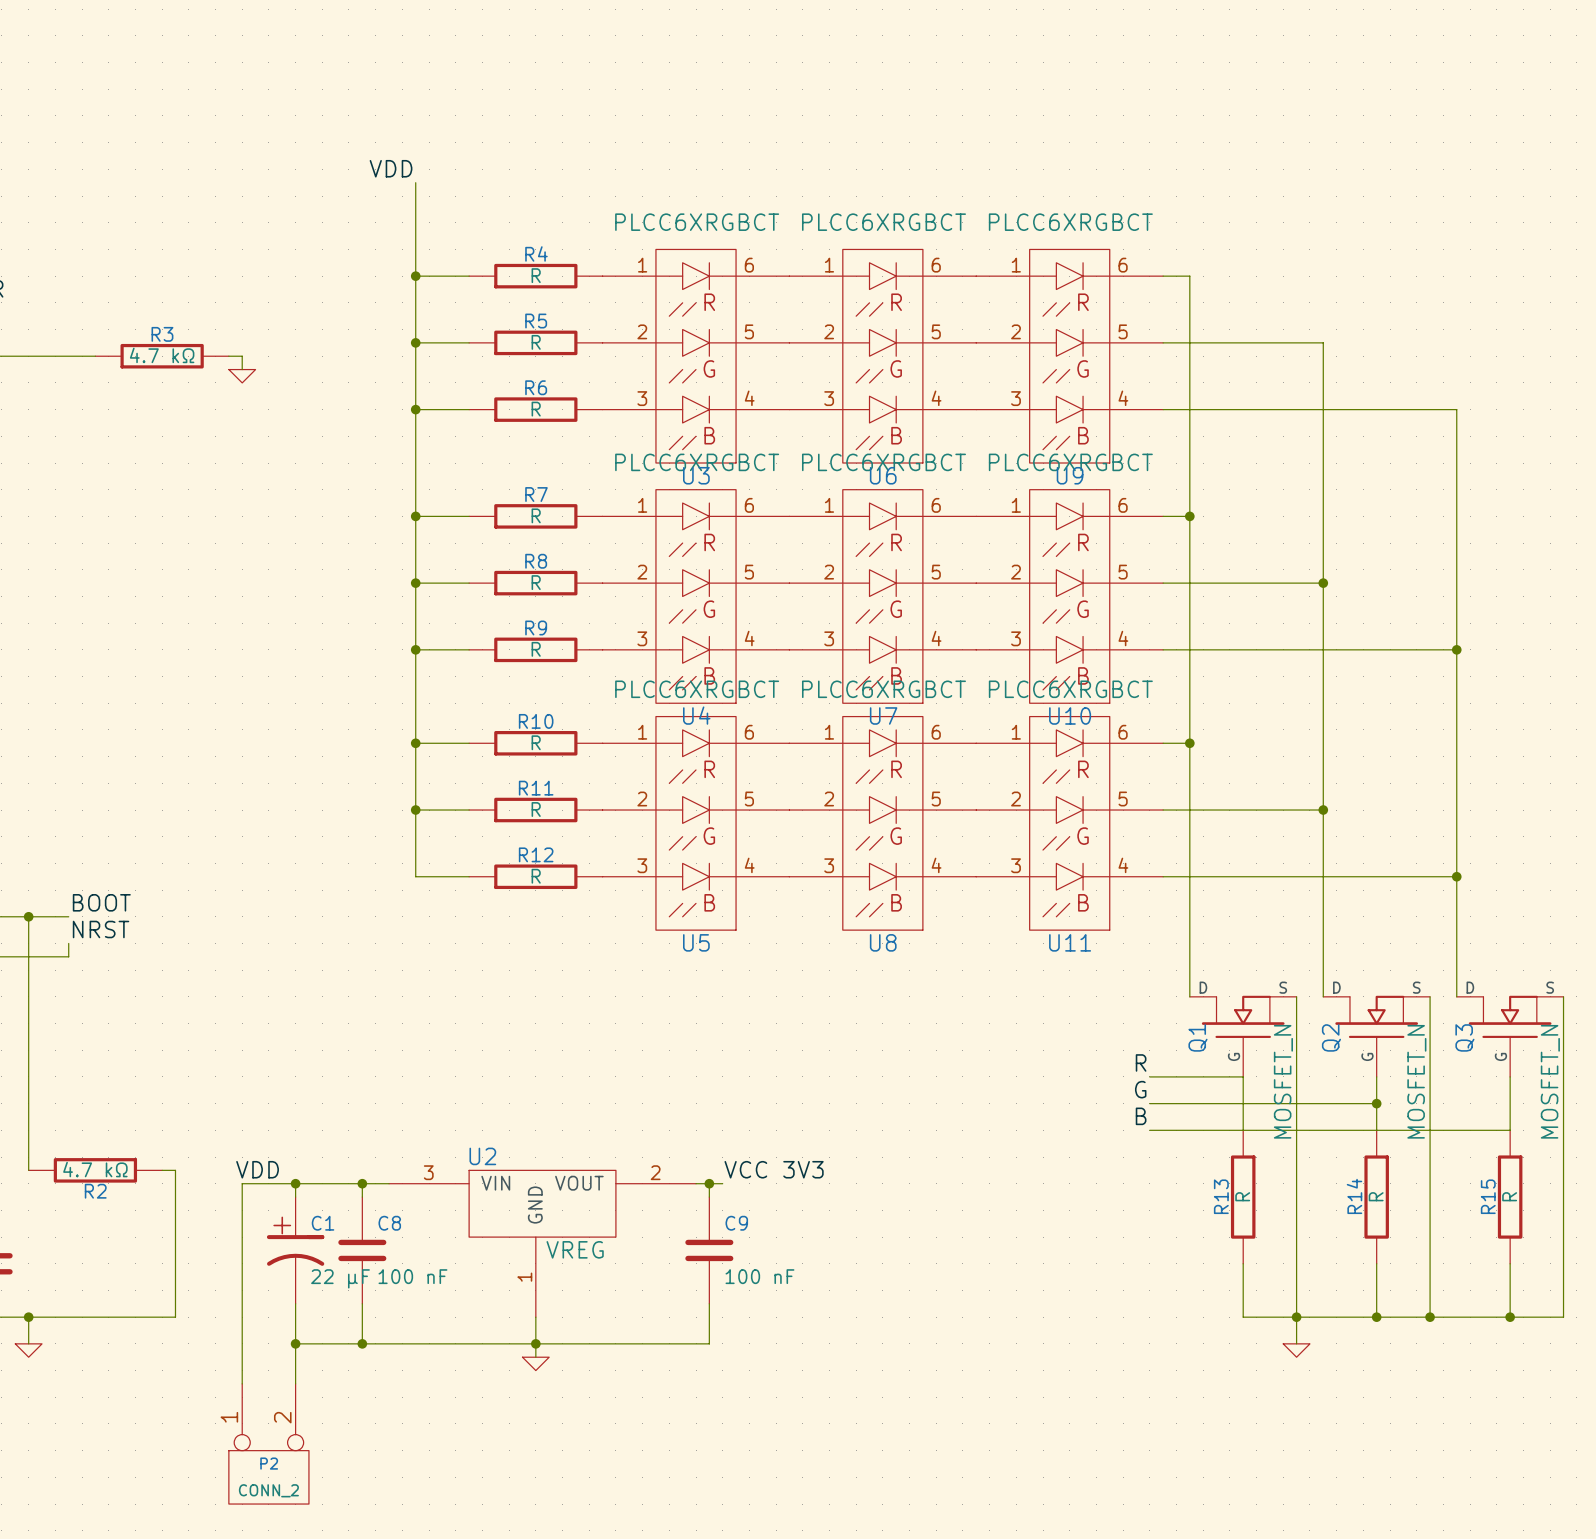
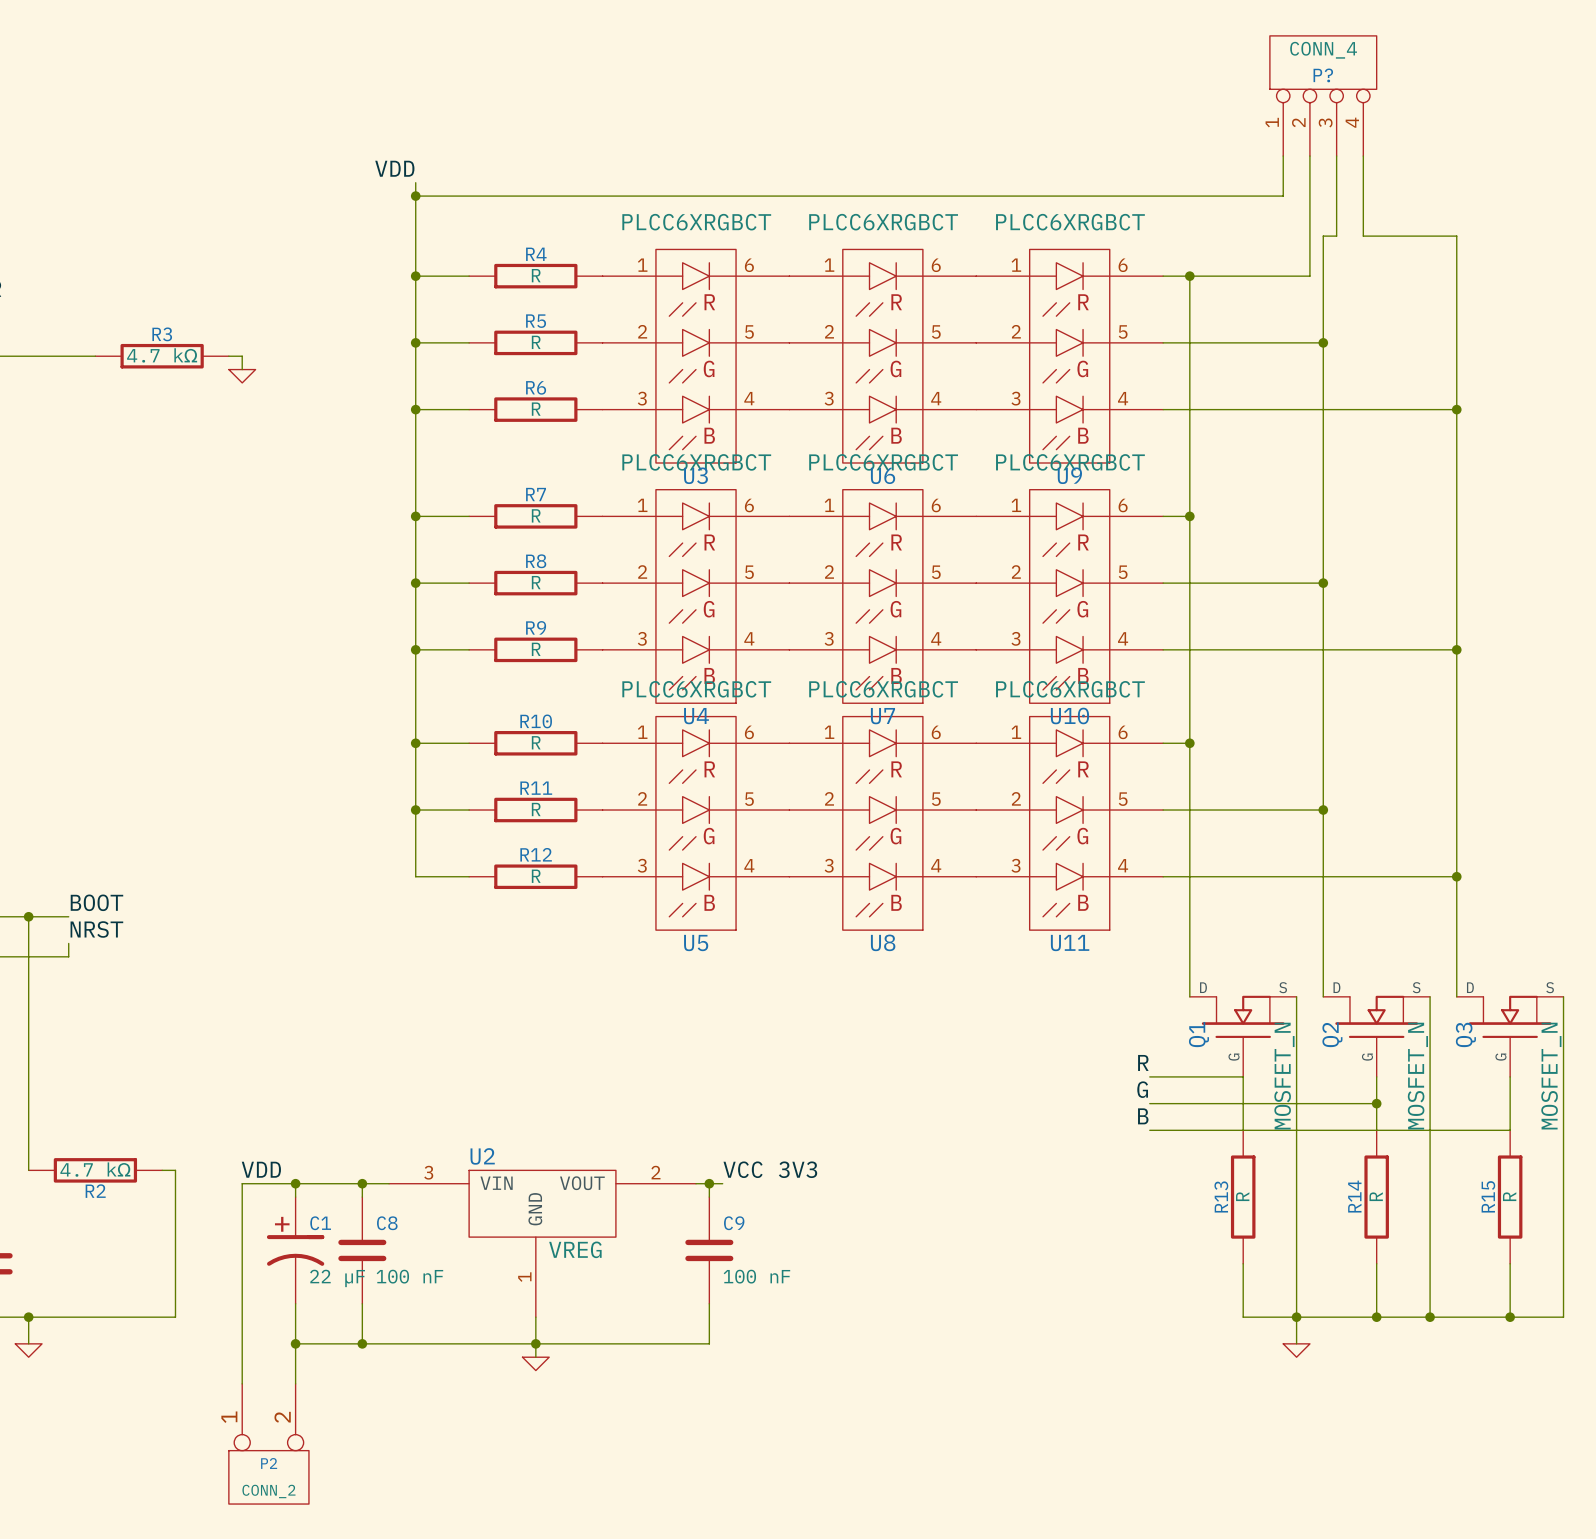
P?: none -> CONN_4 (1323, 95)
wire: none -> (1283, 156) (1283, 196) (415, 196)
wire: none -> (1309, 156) (1309, 276) (1189, 276)
wire: none -> (1336, 156) (1336, 236) (1323, 236) (1323, 342)
wire: none -> (1363, 156) (1363, 236) (1456, 236) (1456, 409)
junction: none -> (415, 196)
junction: none -> (1189, 276)
junction: none -> (1323, 342)
junction: none -> (1456, 409)

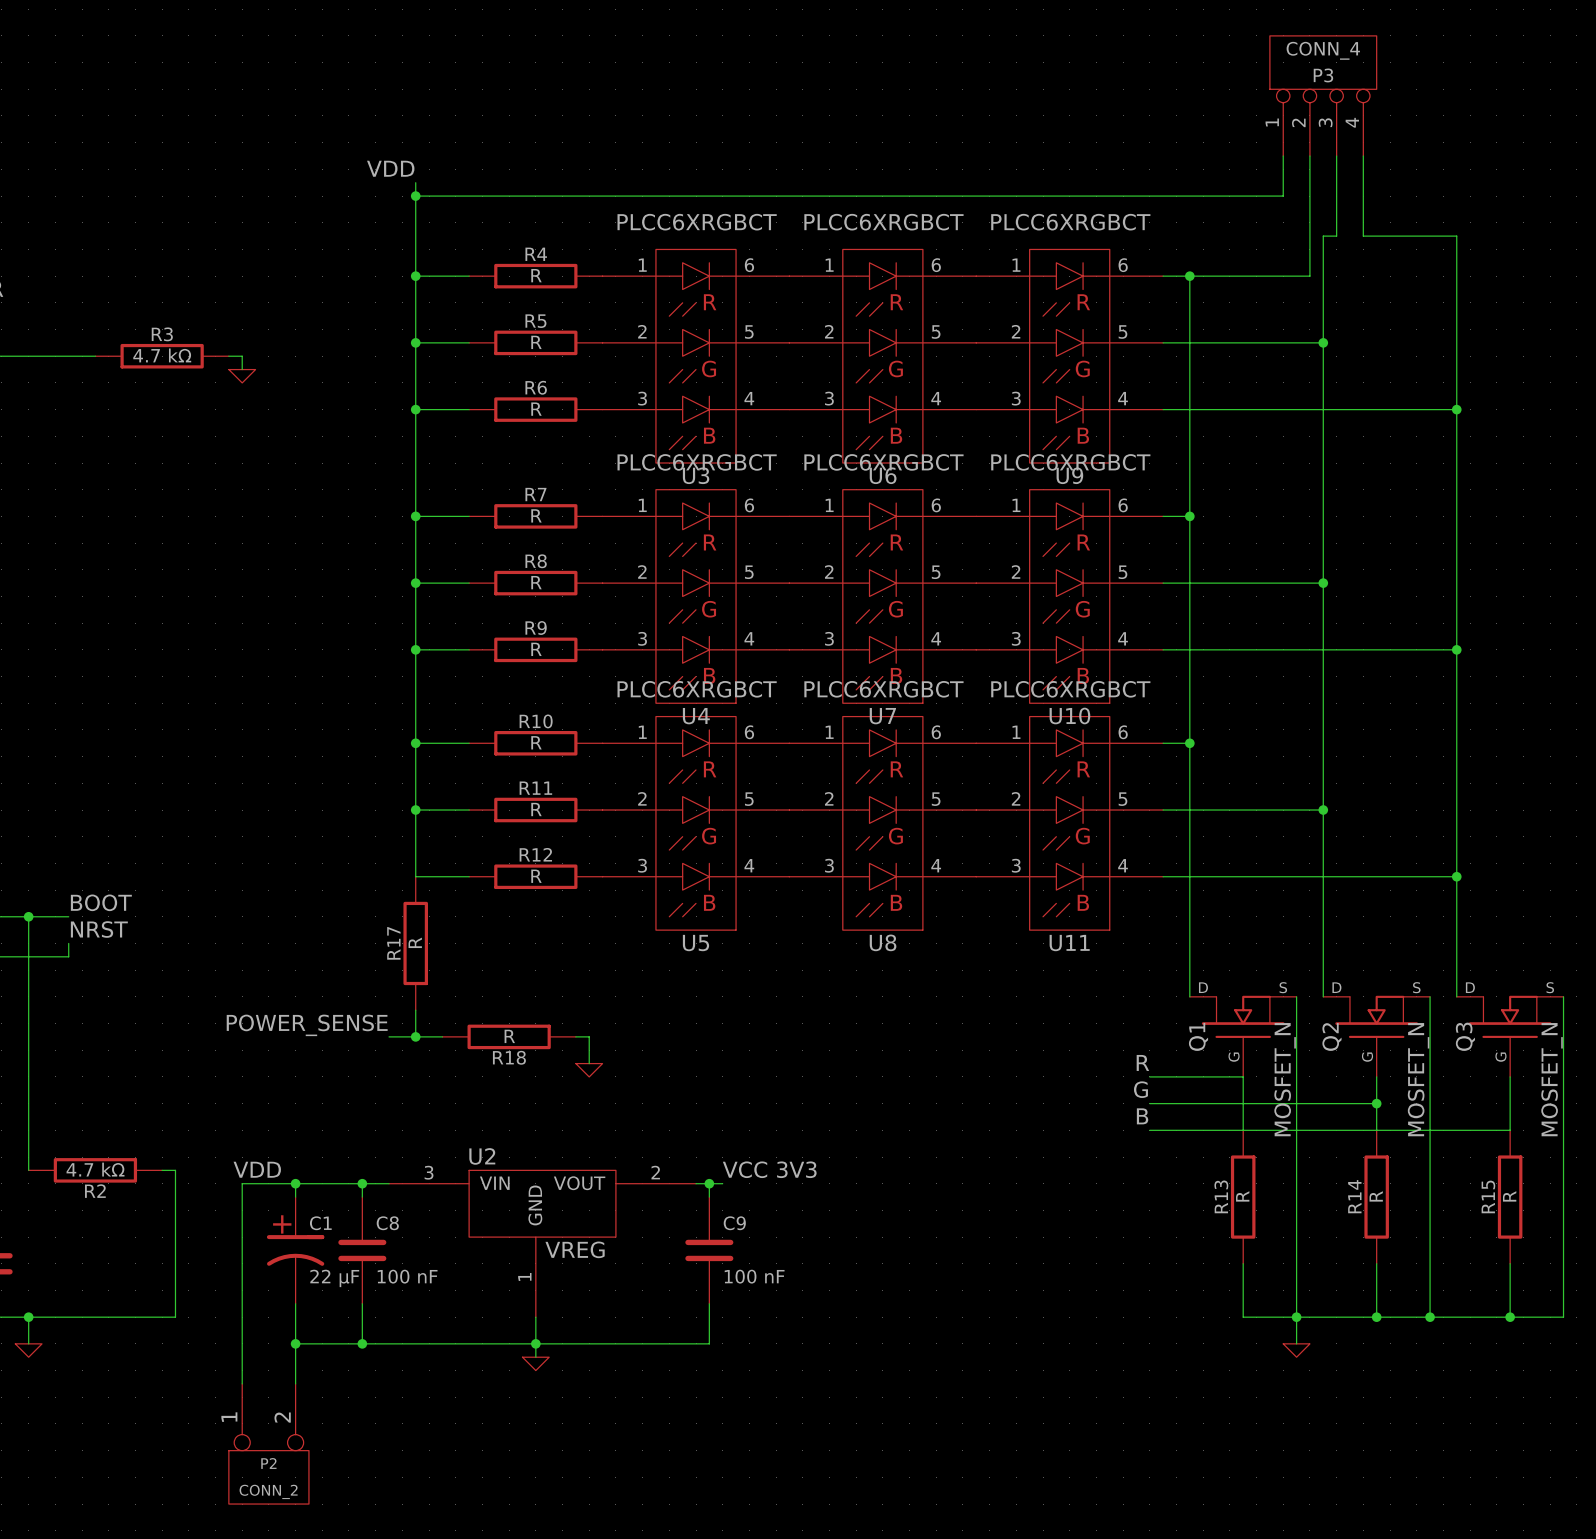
P? name: P? (1323, 75) -> P3 (1323, 75)
R17: none -> R (415, 943)
wire: none -> (415, 1010) (415, 1036)
label: none -> POWER_SENSE (307, 1025)
wire: none -> (389, 1036) (442, 1036)
junction: none -> (415, 1036)
R18: none -> R (509, 1036)
wire: none -> (575, 1036) (589, 1036) (589, 1063)
power symbol: none -> (589, 1070)

